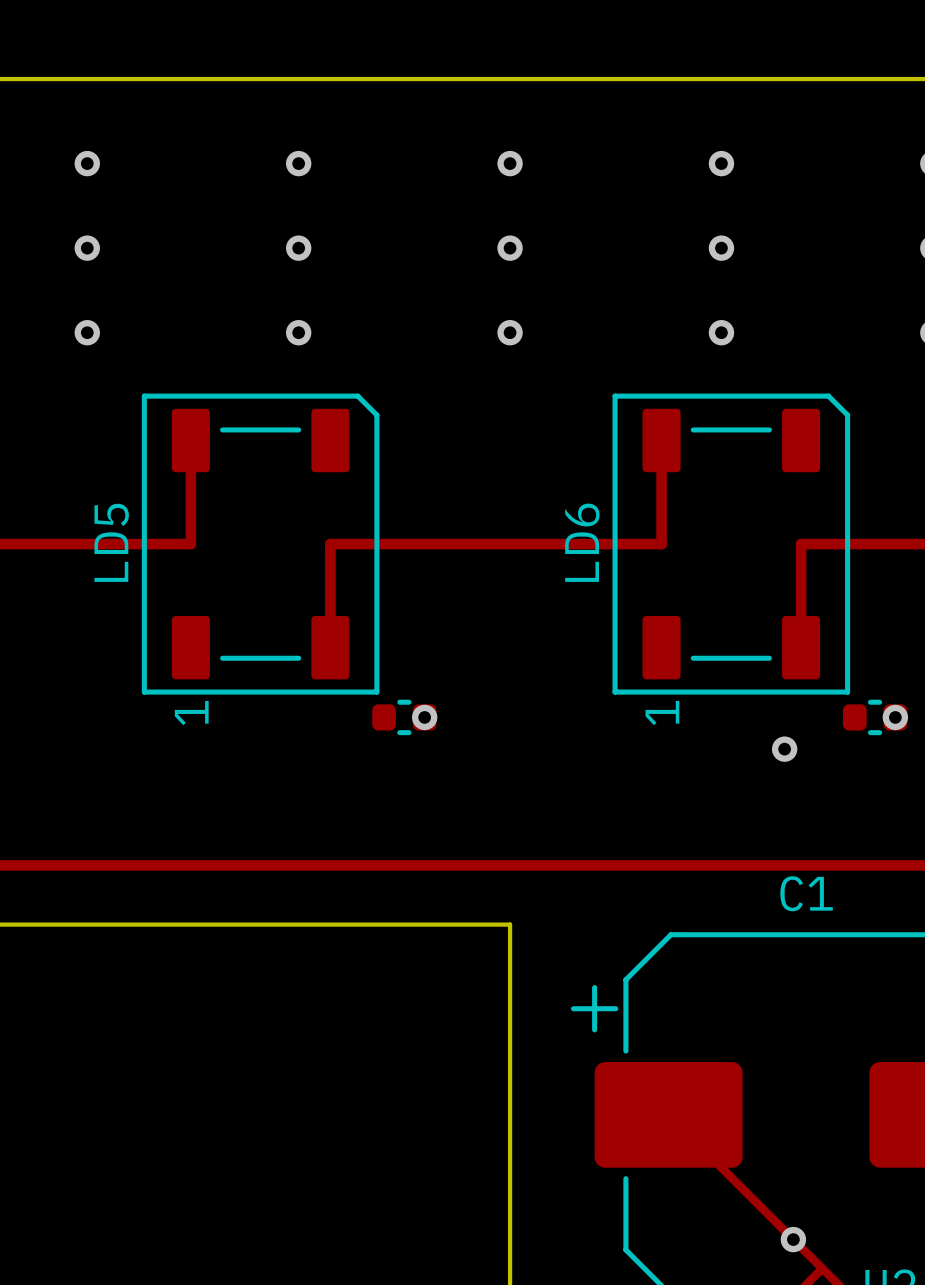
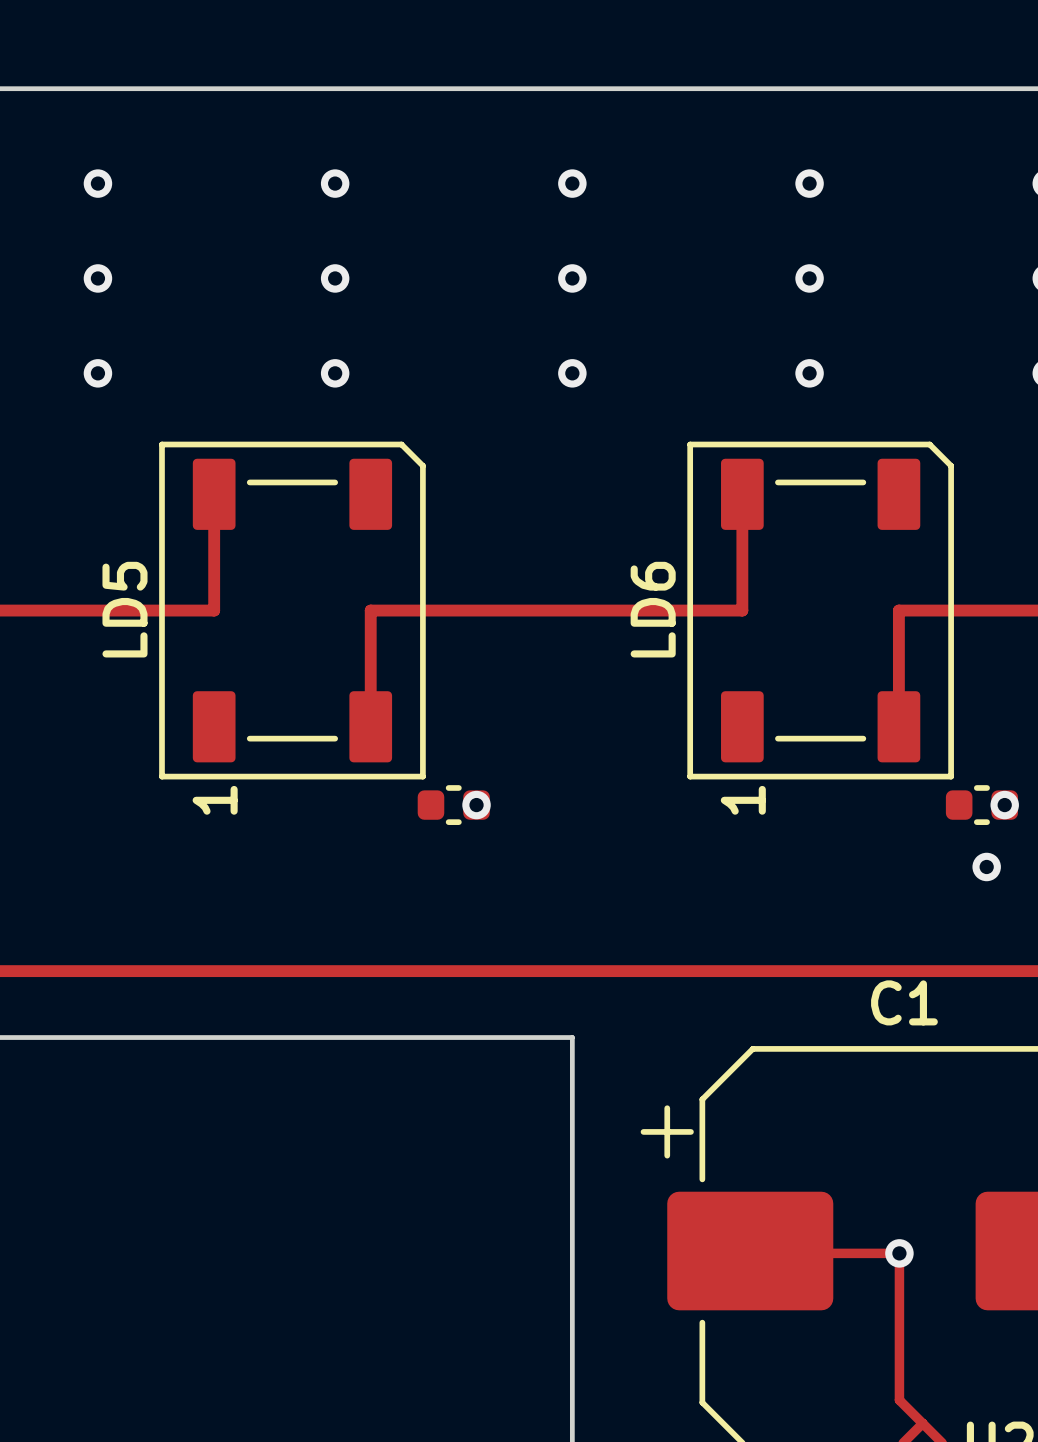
via position: (784, 749) -> (986, 866)
track: (670, 1116) (801, 1247) -> (752, 1253) (899, 1253) (899, 1400)
via position: (793, 1239) -> (899, 1253)

